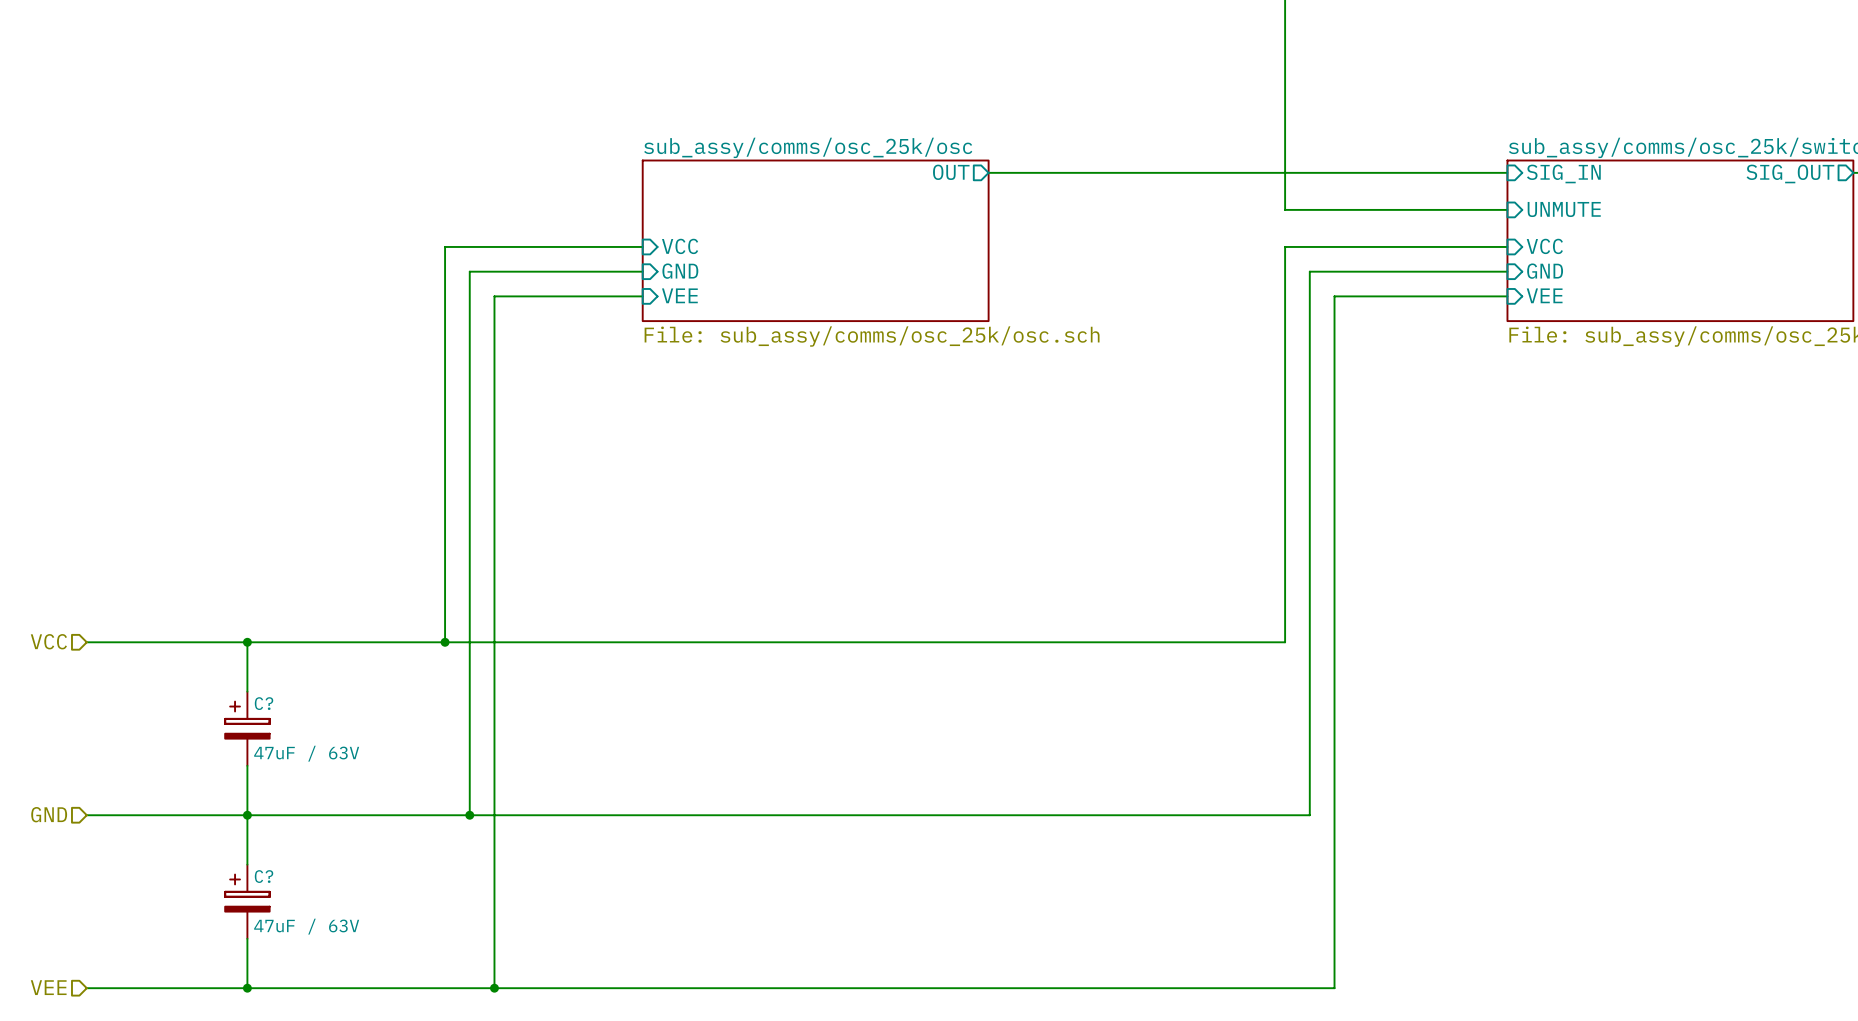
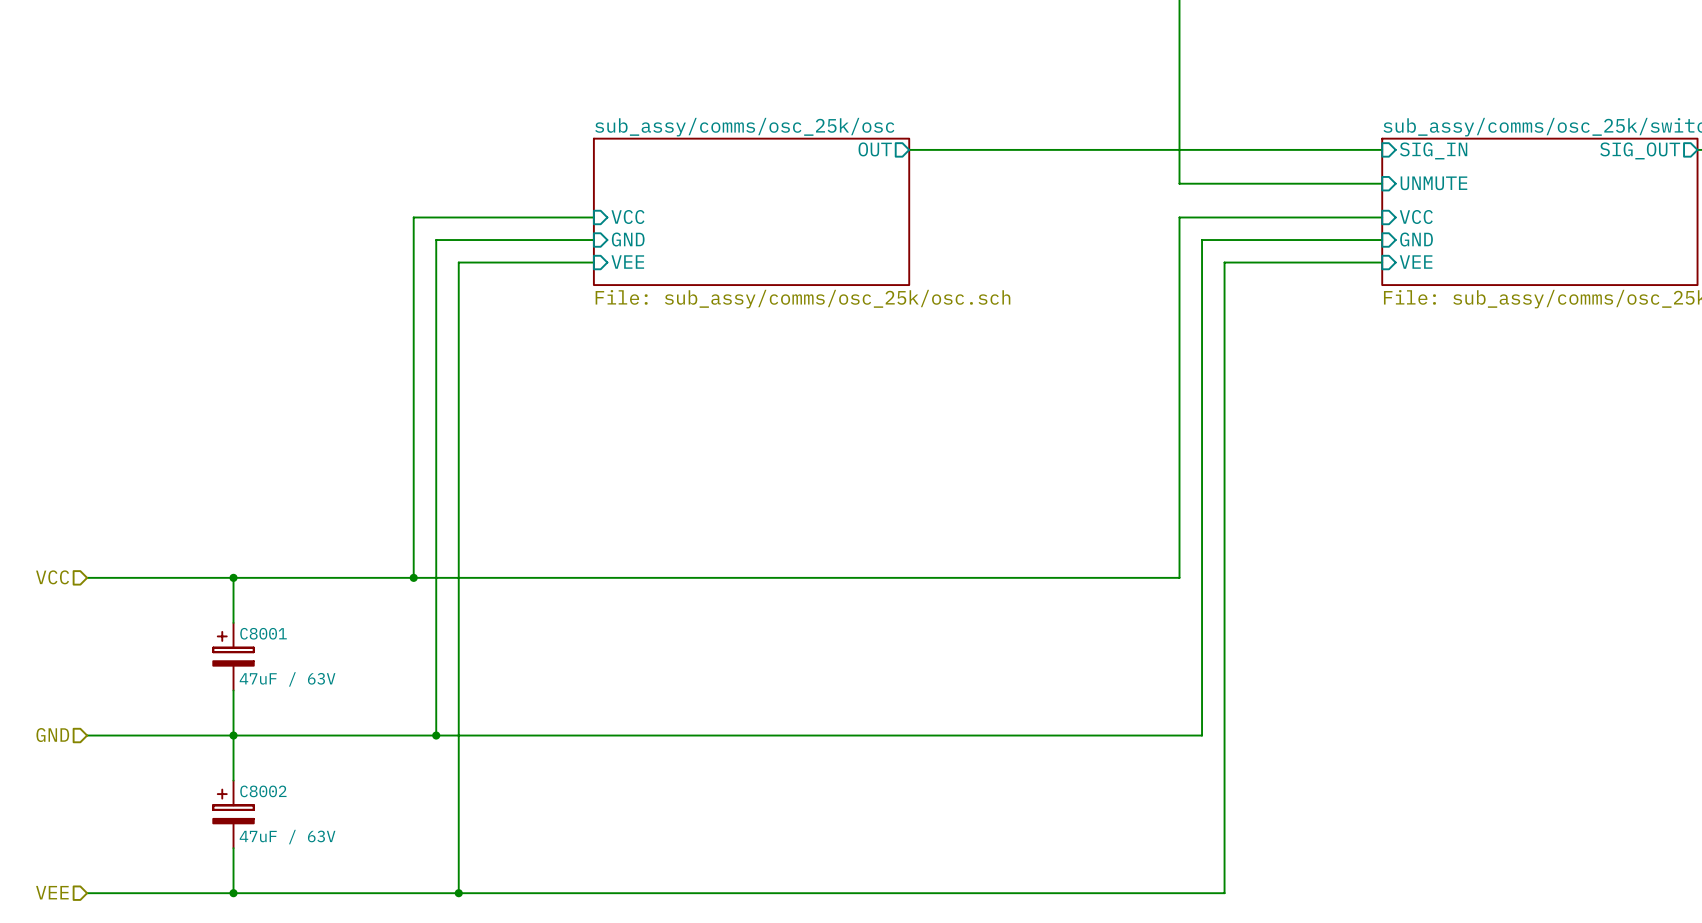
C? name: C? (264, 703) -> C8001 (263, 633)
C? name: C? (264, 876) -> C8002 (263, 791)

